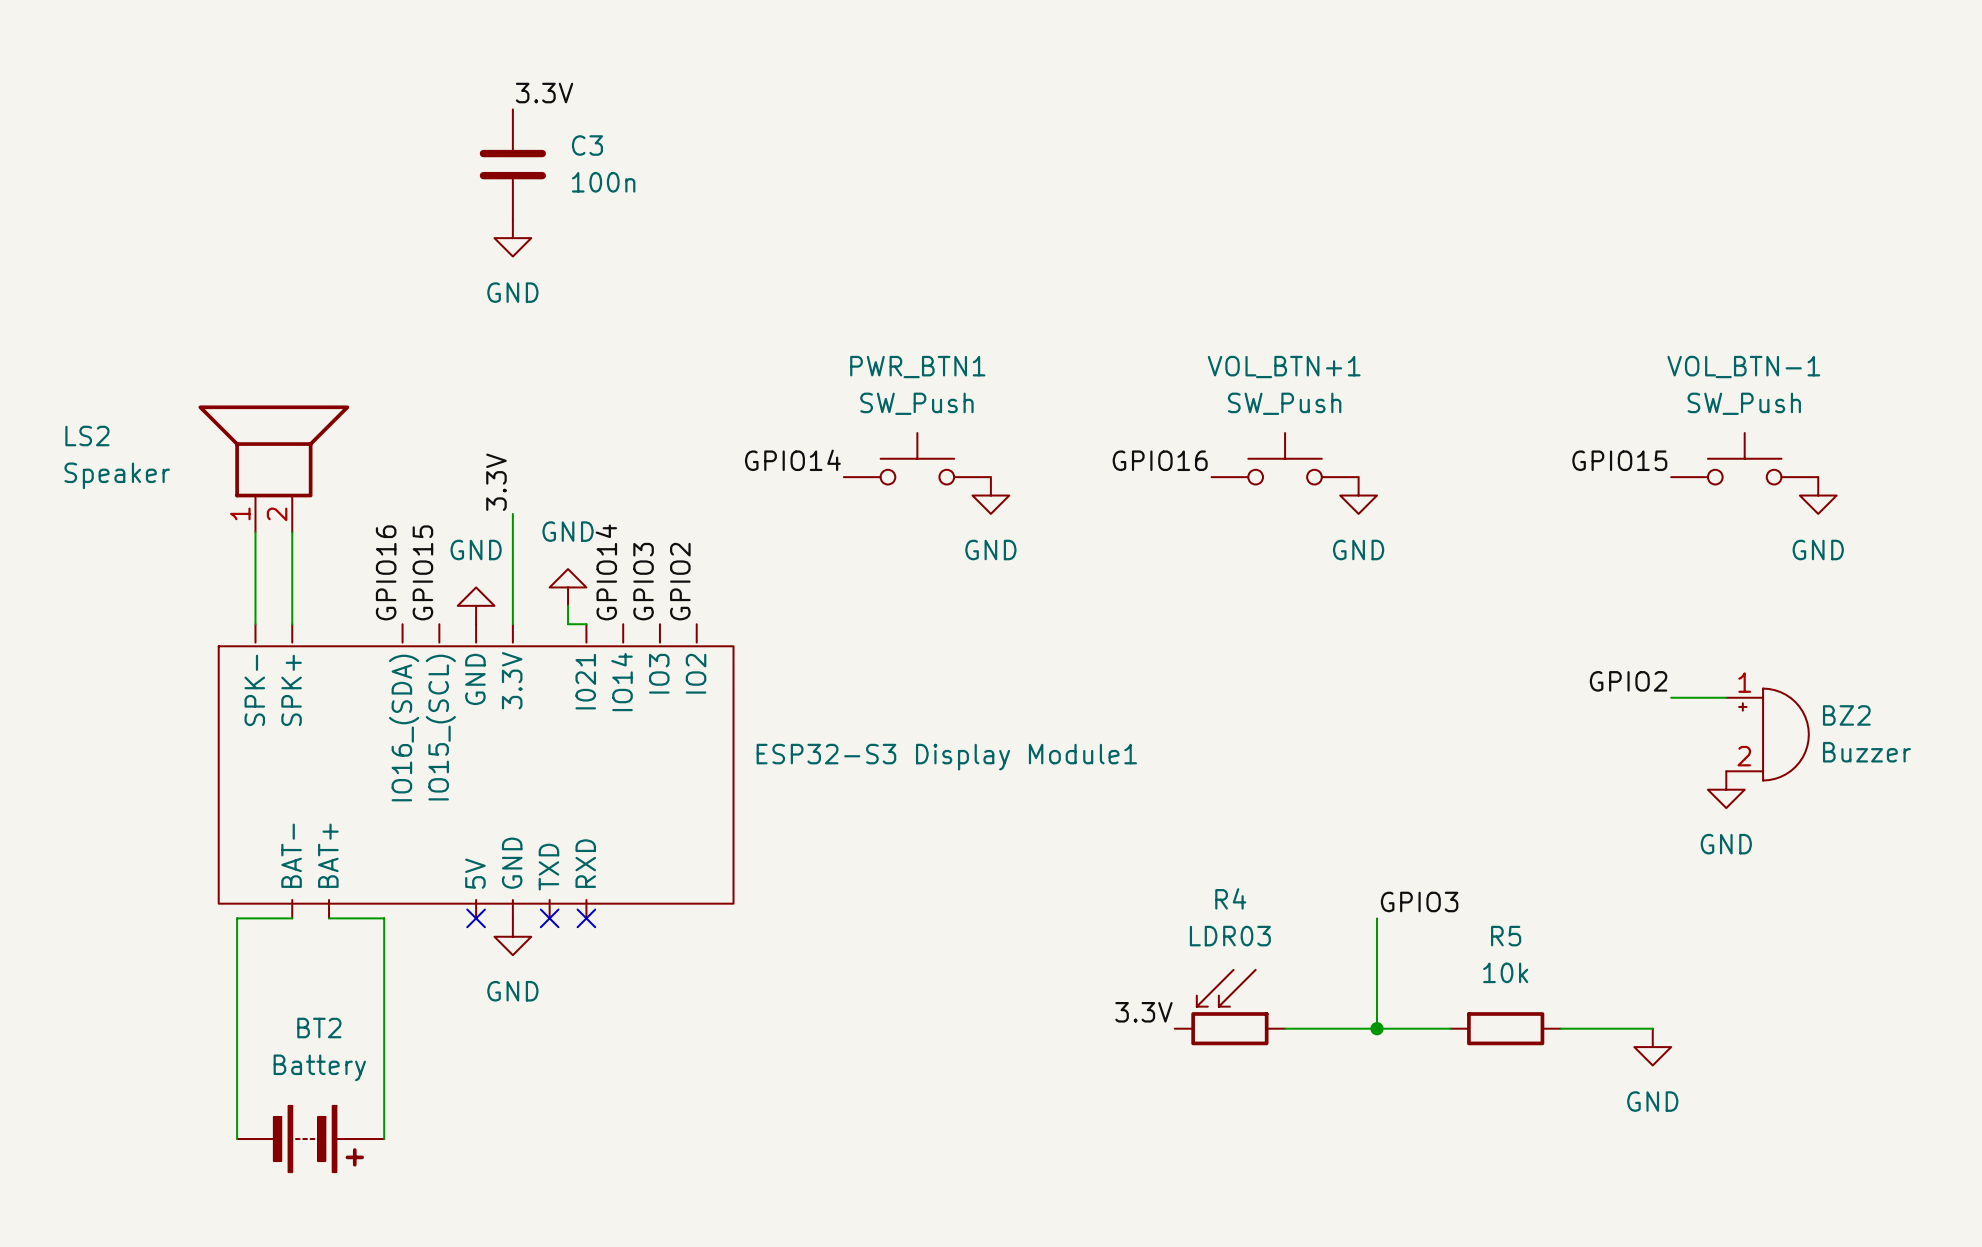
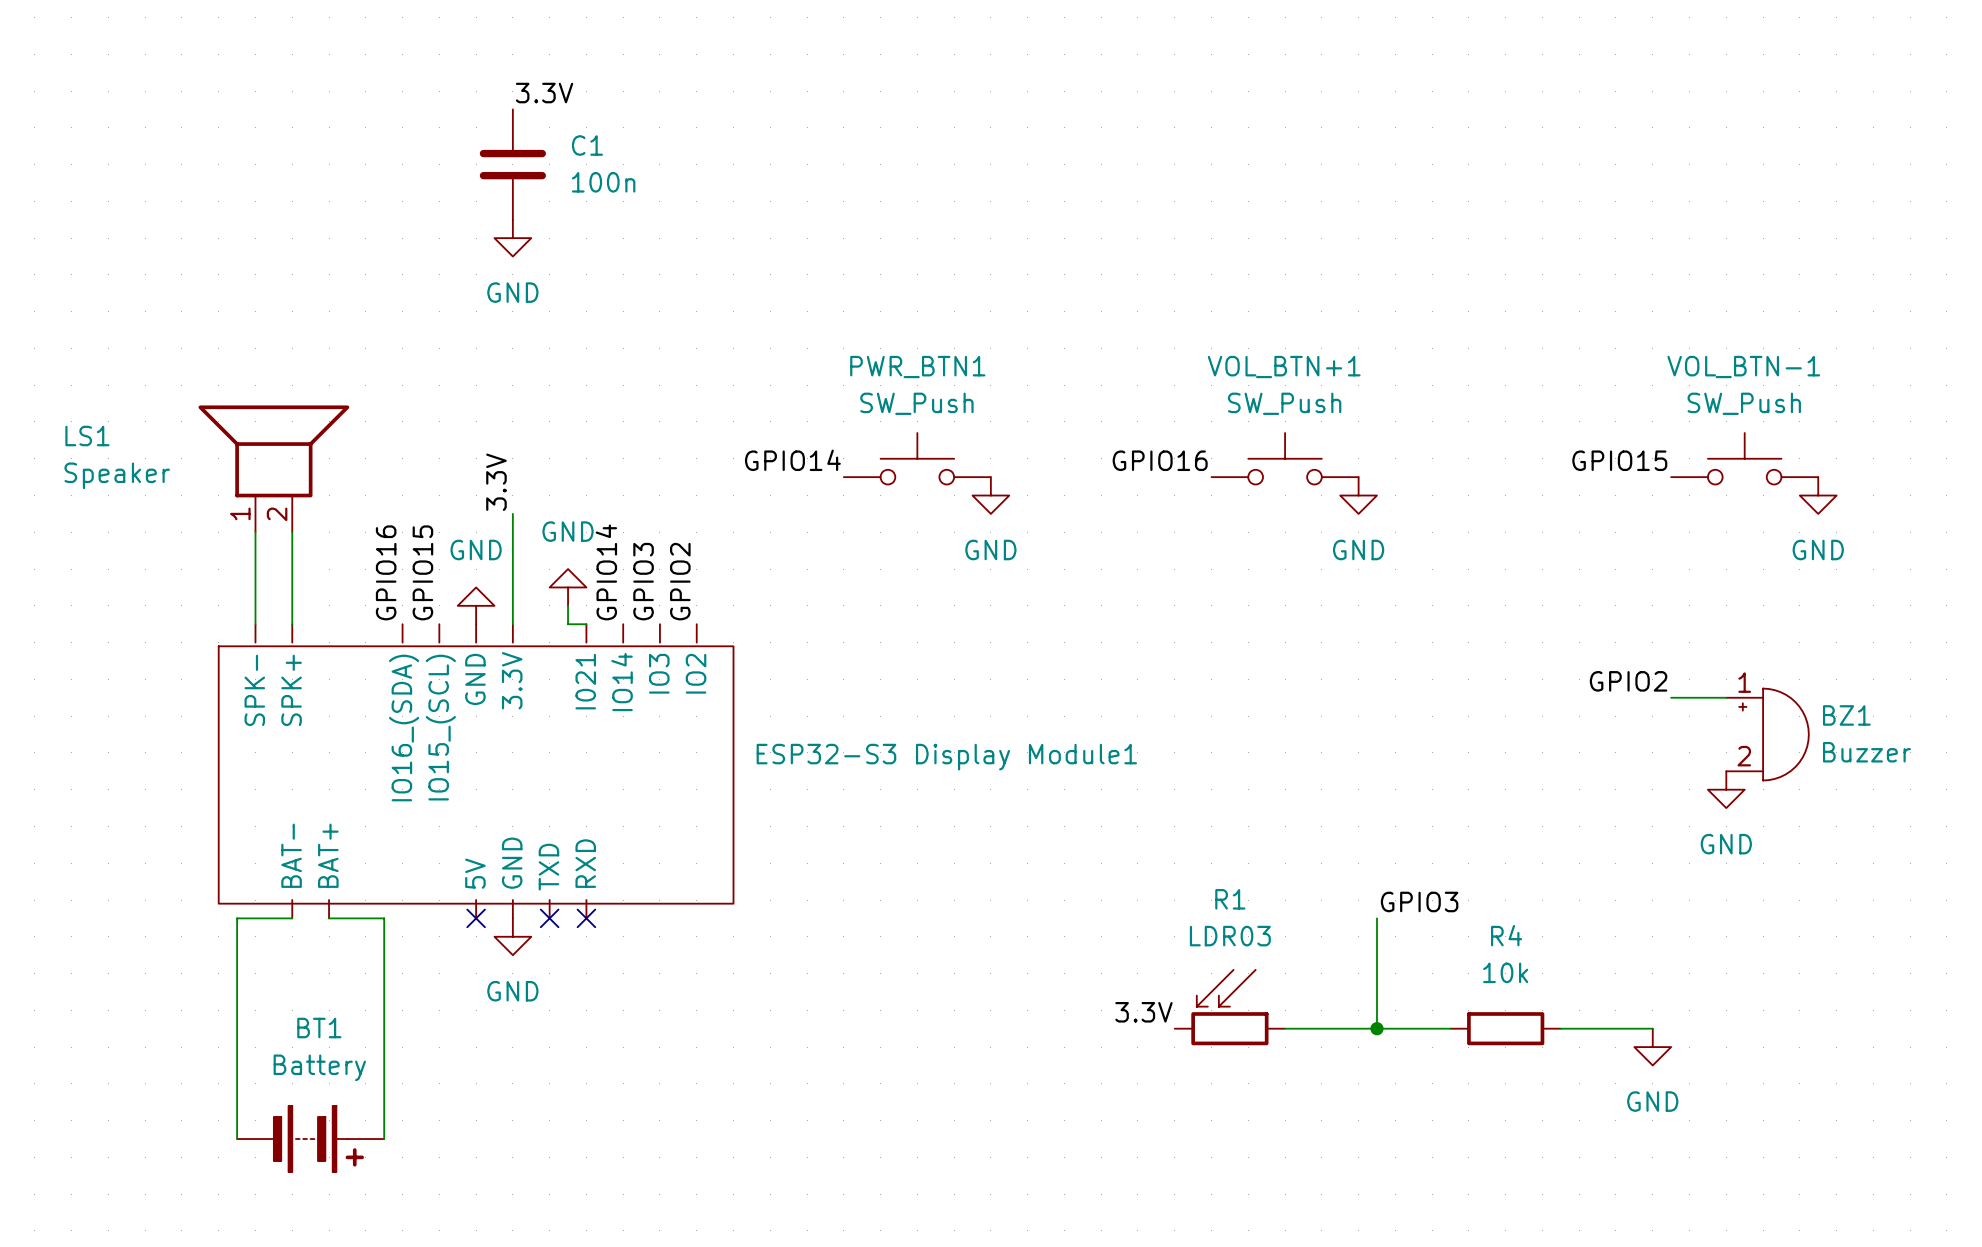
C3 name: C3 (587, 145) -> C1 (587, 145)
LS2 name: LS2 (87, 436) -> LS1 (87, 436)
BZ2 name: BZ2 (1846, 715) -> BZ1 (1846, 715)
R4 name: R4 (1230, 898) -> R1 (1230, 899)
R5 name: R5 (1506, 936) -> R4 (1506, 935)
BT2 name: BT2 (319, 1028) -> BT1 (319, 1028)

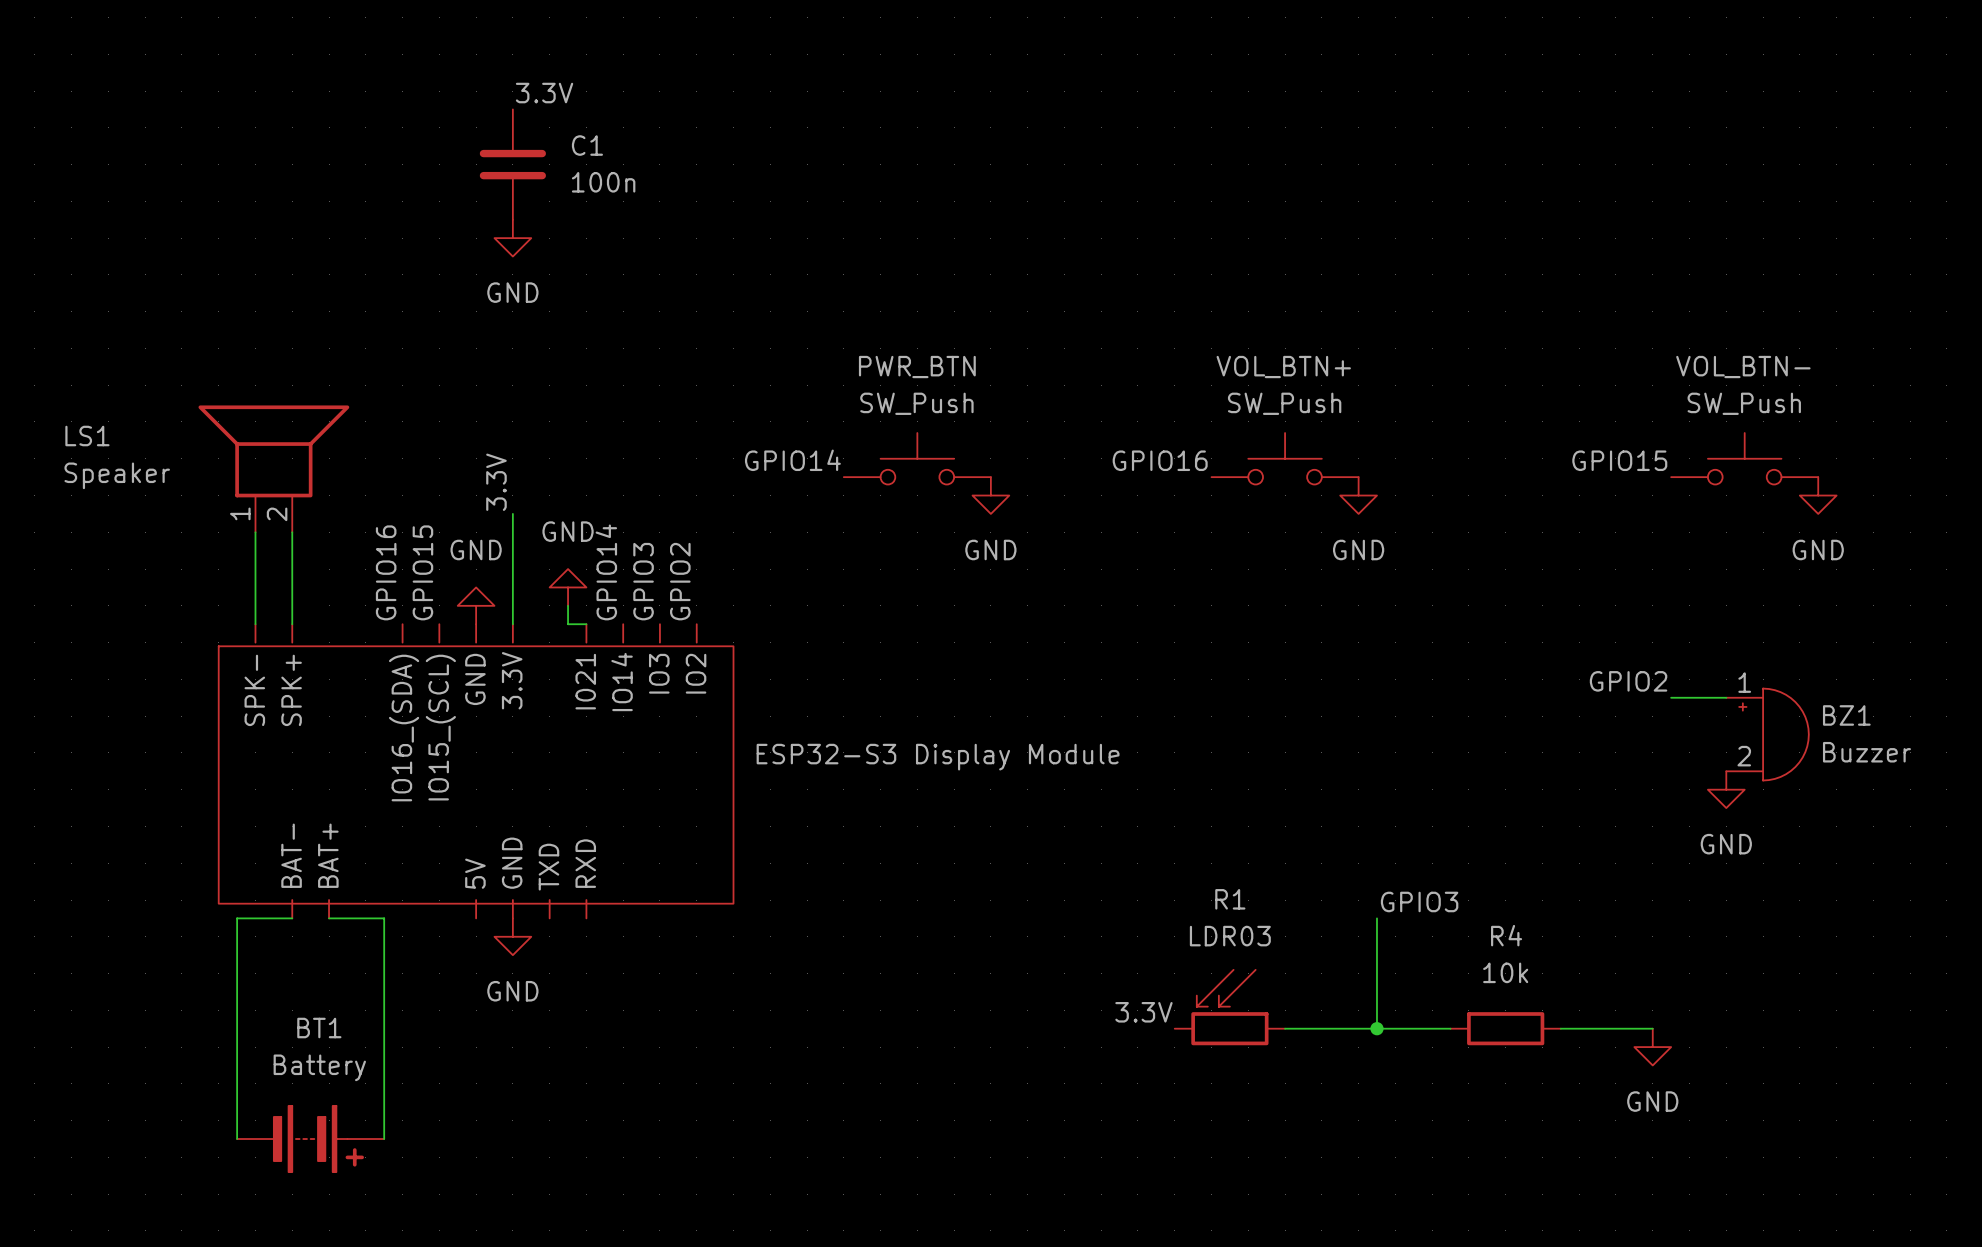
PWR_BTN1 name: PWR_BTN1 (917, 367) -> PWR_BTN (917, 367)
VOL_BTN+1 name: VOL_BTN+1 (1284, 367) -> VOL_BTN+ (1283, 367)
VOL_BTN-1 name: VOL_BTN-1 (1743, 367) -> VOL_BTN- (1743, 367)
ESP32-S3 Display Module1 name: ESP32-S3 Display Module1 (946, 757) -> ESP32-S3 Display Module (938, 757)
no-connect mark: (476, 918) -> none
no-connect mark: (549, 918) -> none
no-connect mark: (586, 918) -> none

